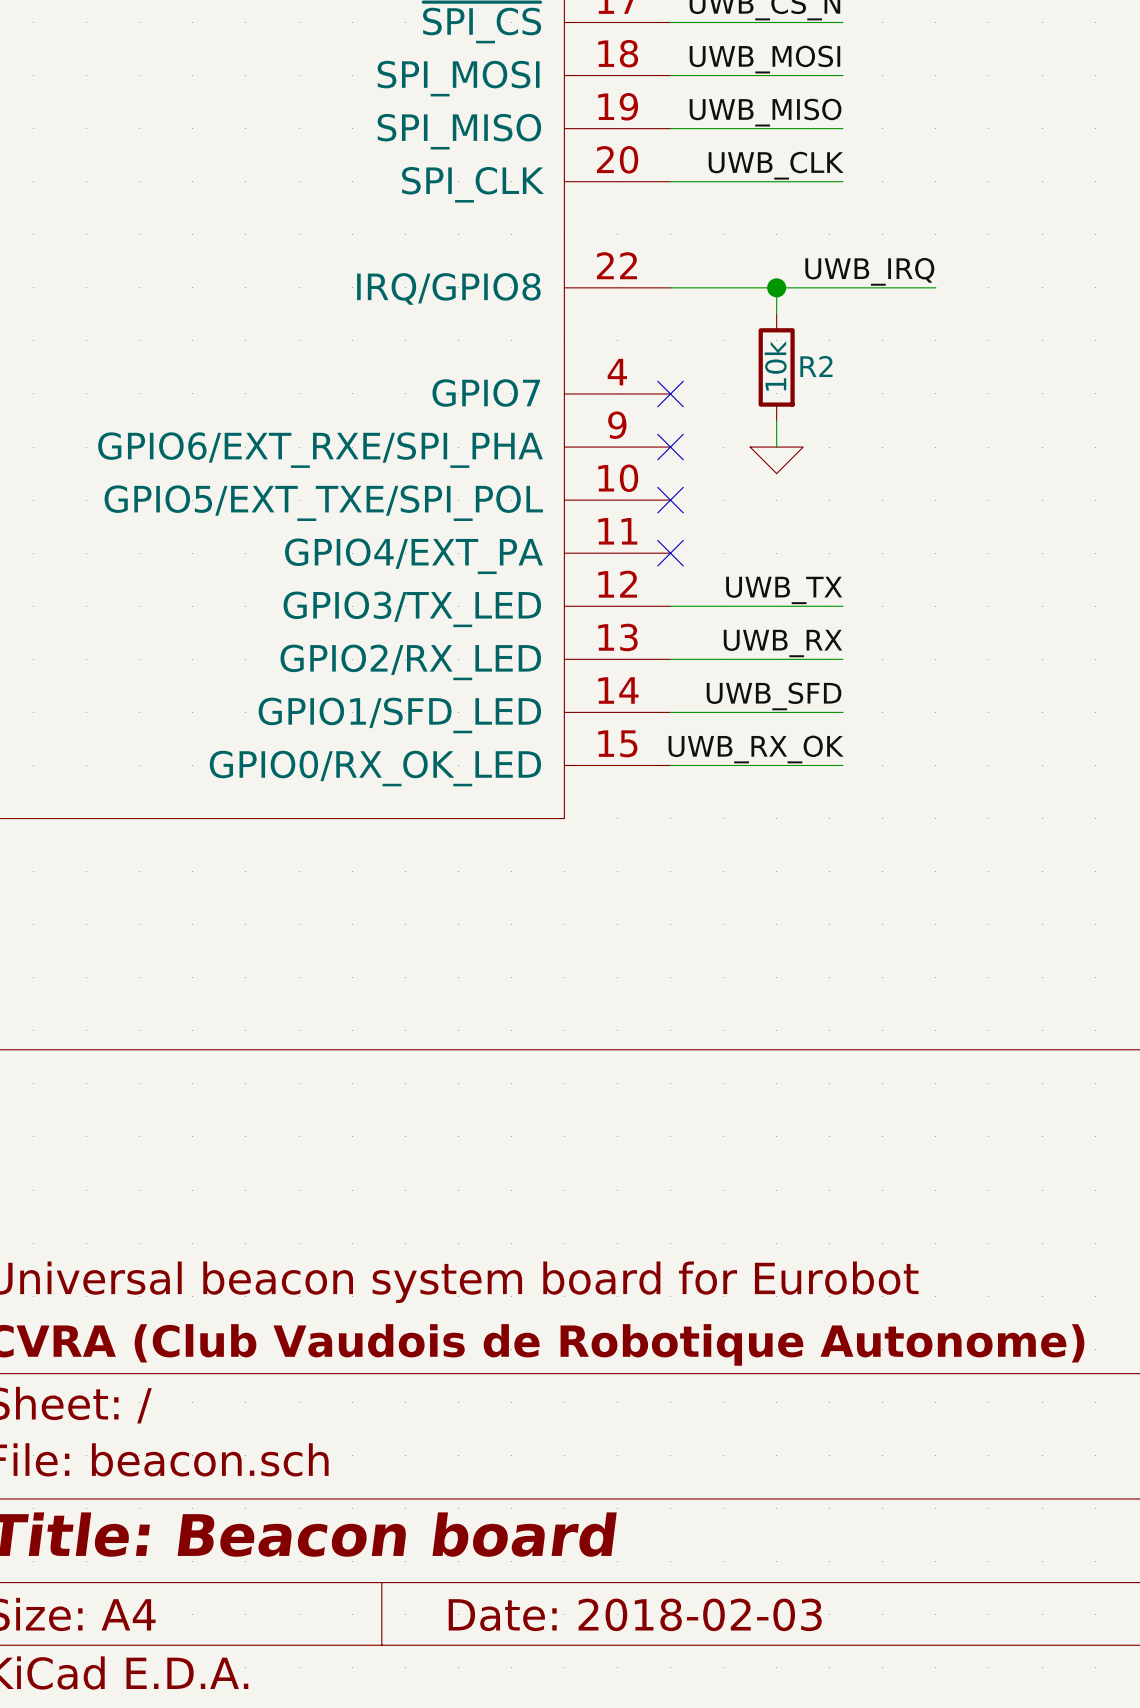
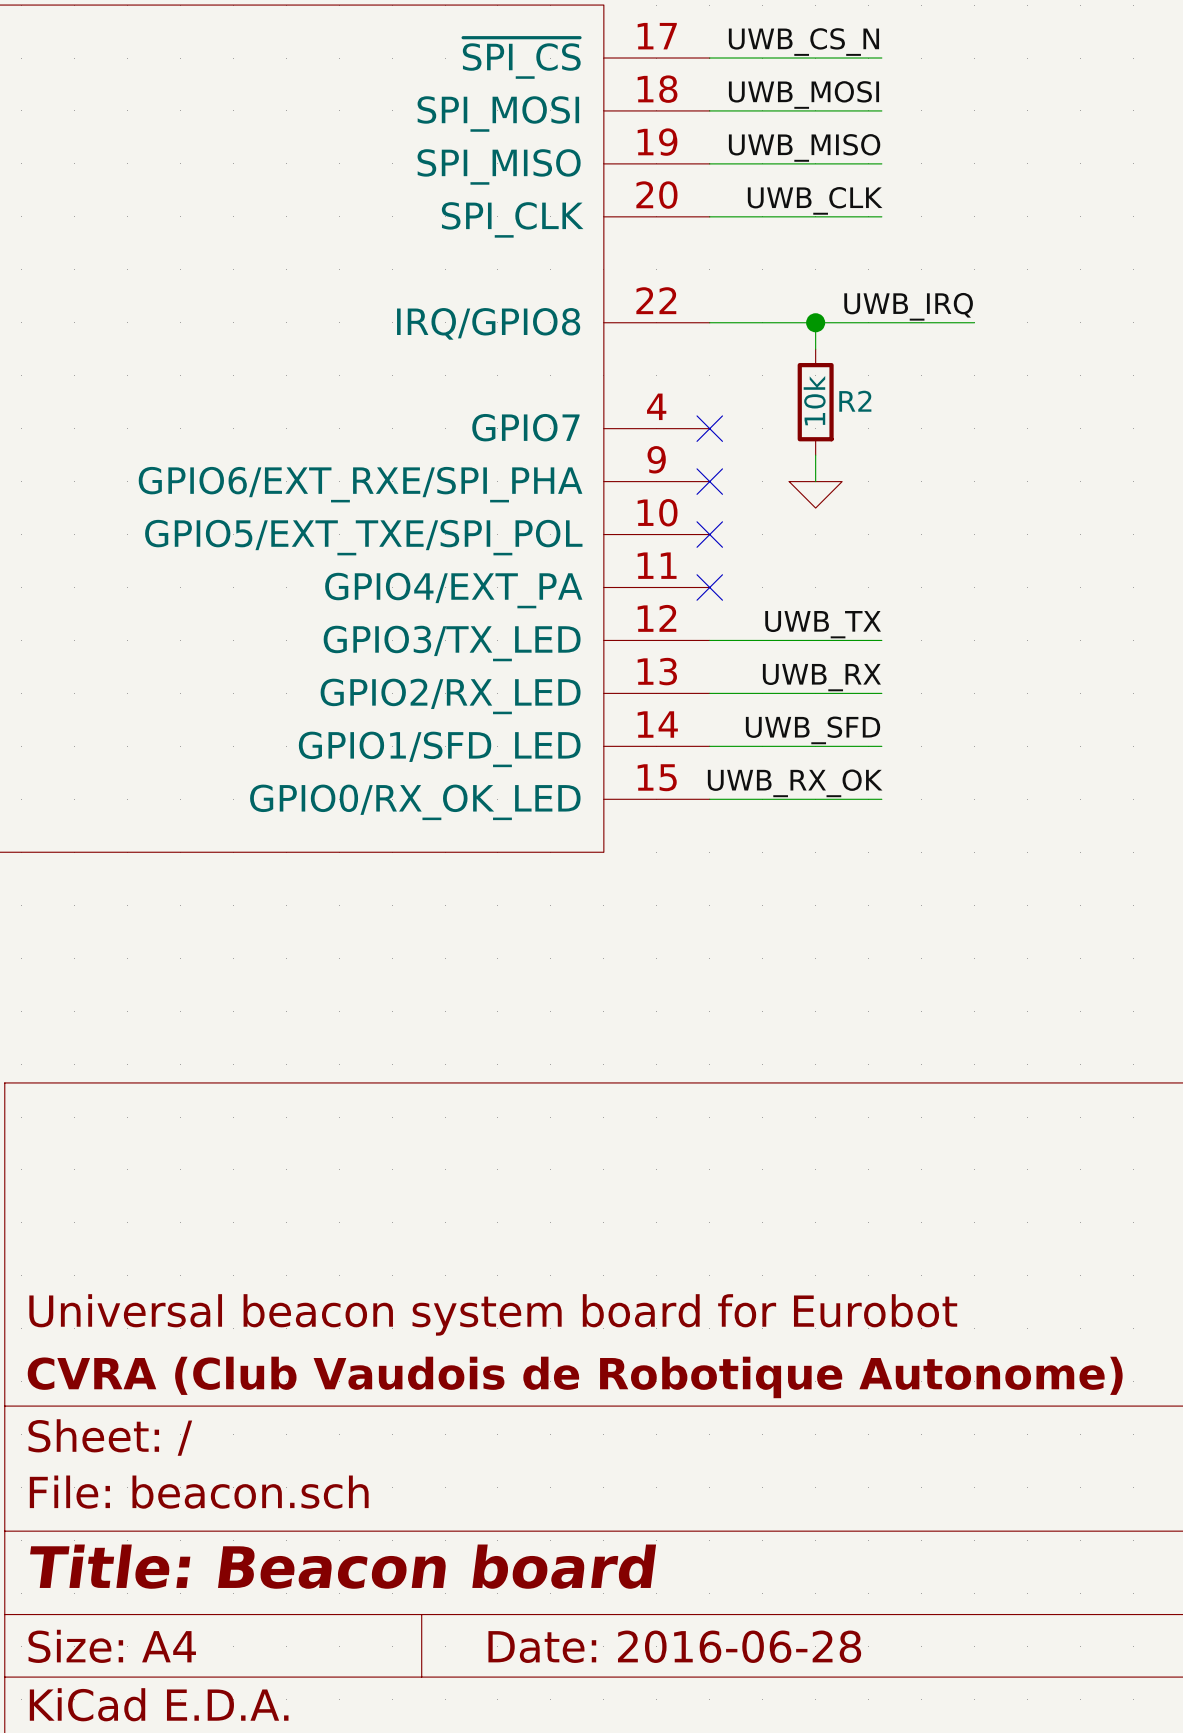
title block: Date: 2018-02-03 (635, 1614) -> Date: 2016-06-28 (674, 1646)

